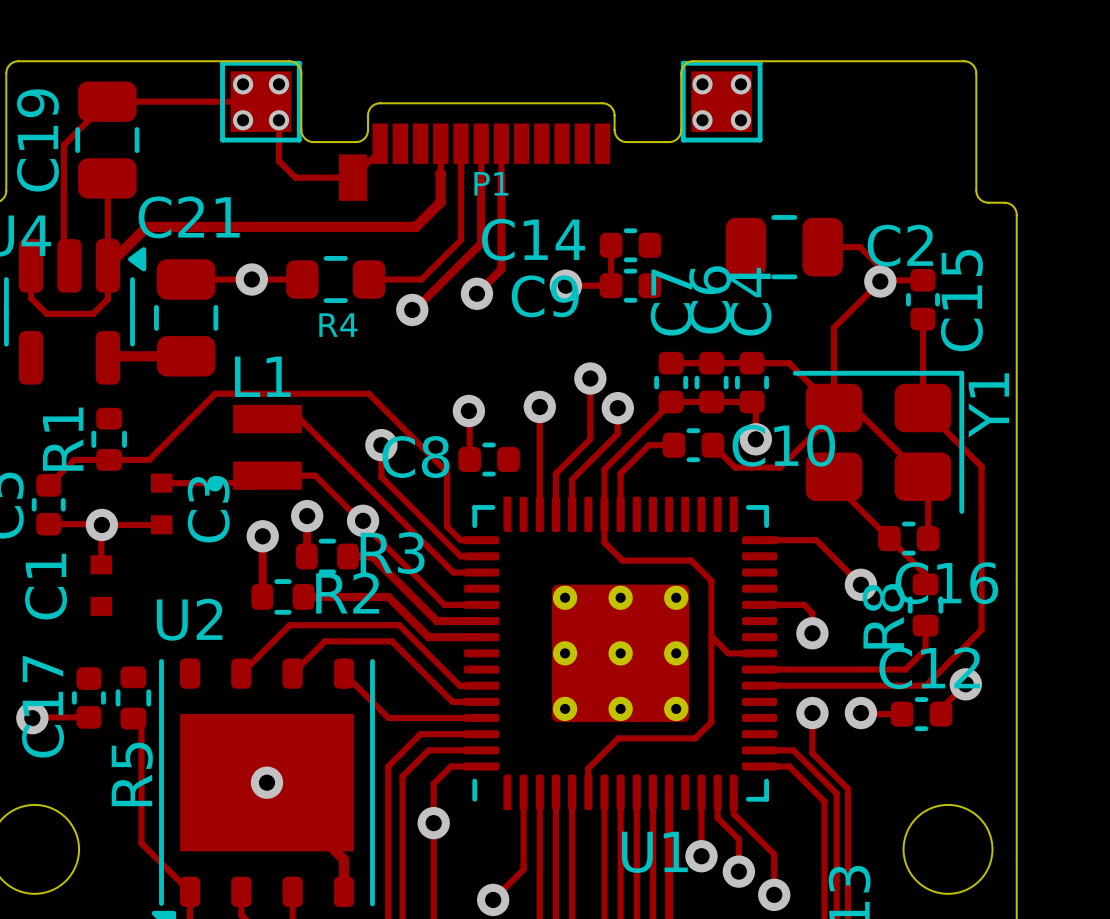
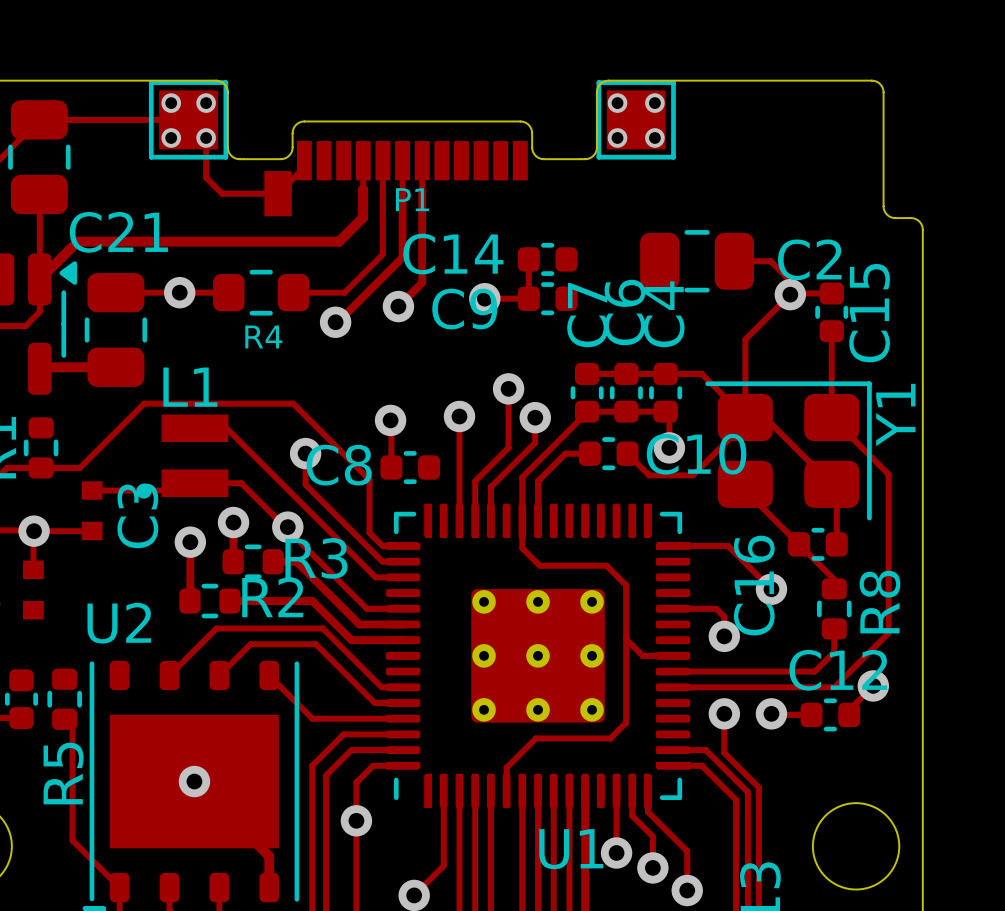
C16 name rotation: 0° (946, 583) -> 90° counterclockwise (754, 585)
R8 name position: R8 (883, 616) -> R8 (879, 602)

